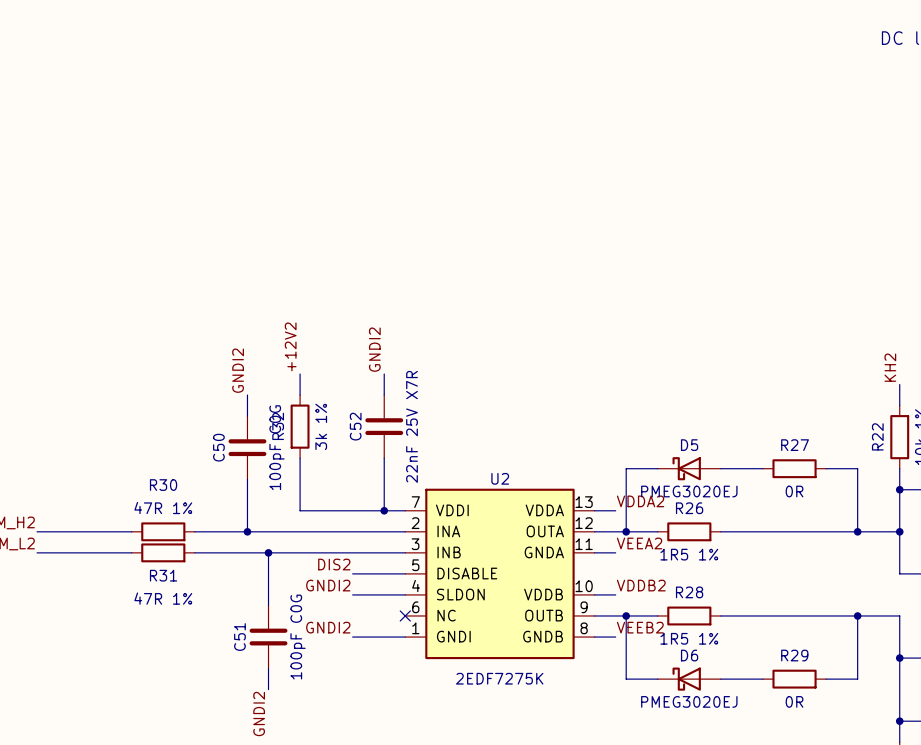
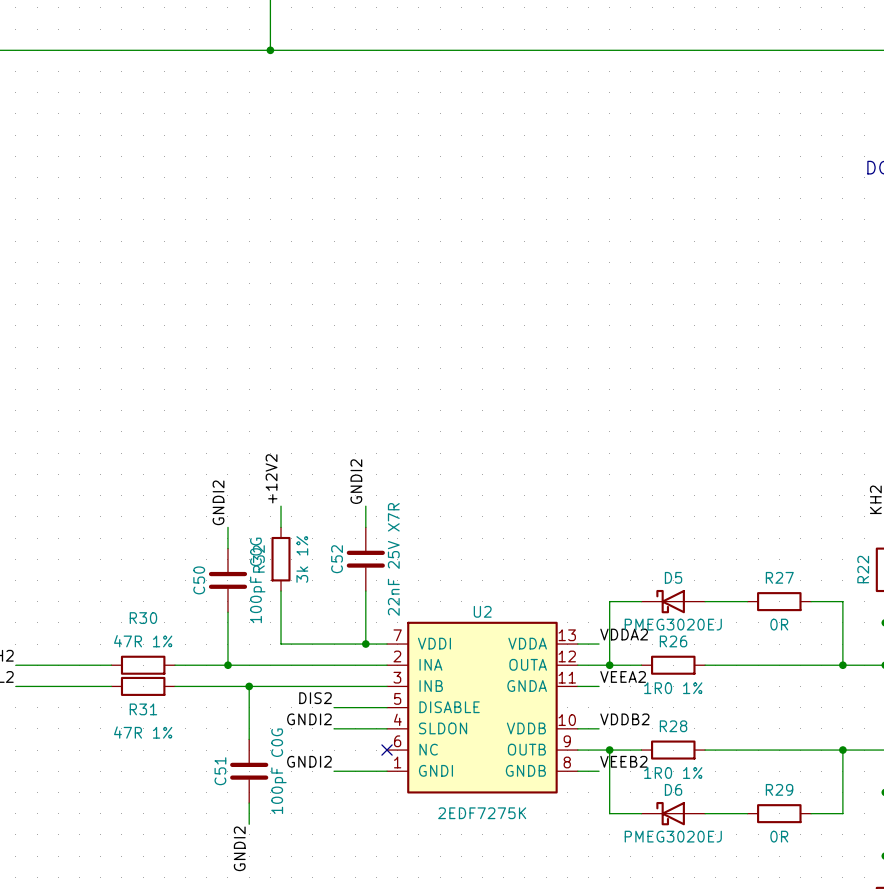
R26 value: 1R5 1% (689, 554) -> 1R0 1% (673, 688)
R28 value: 1R5 1% (689, 638) -> 1R0 1% (673, 773)

